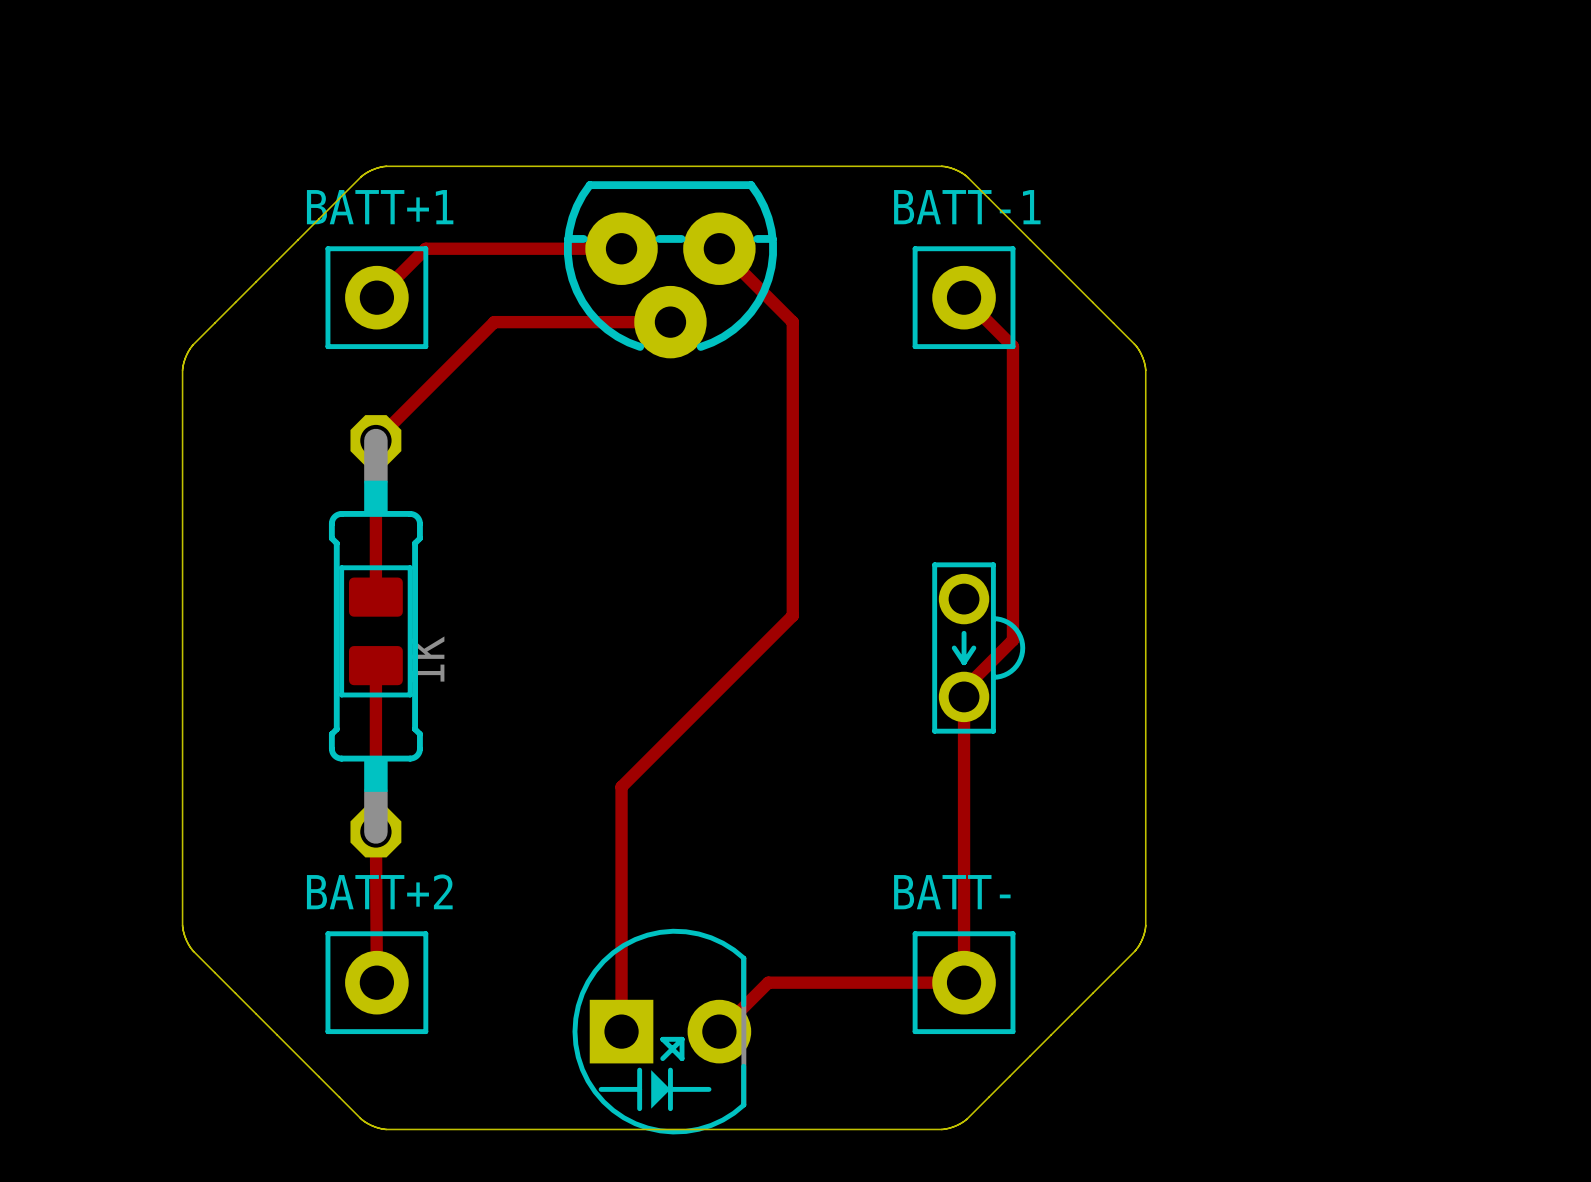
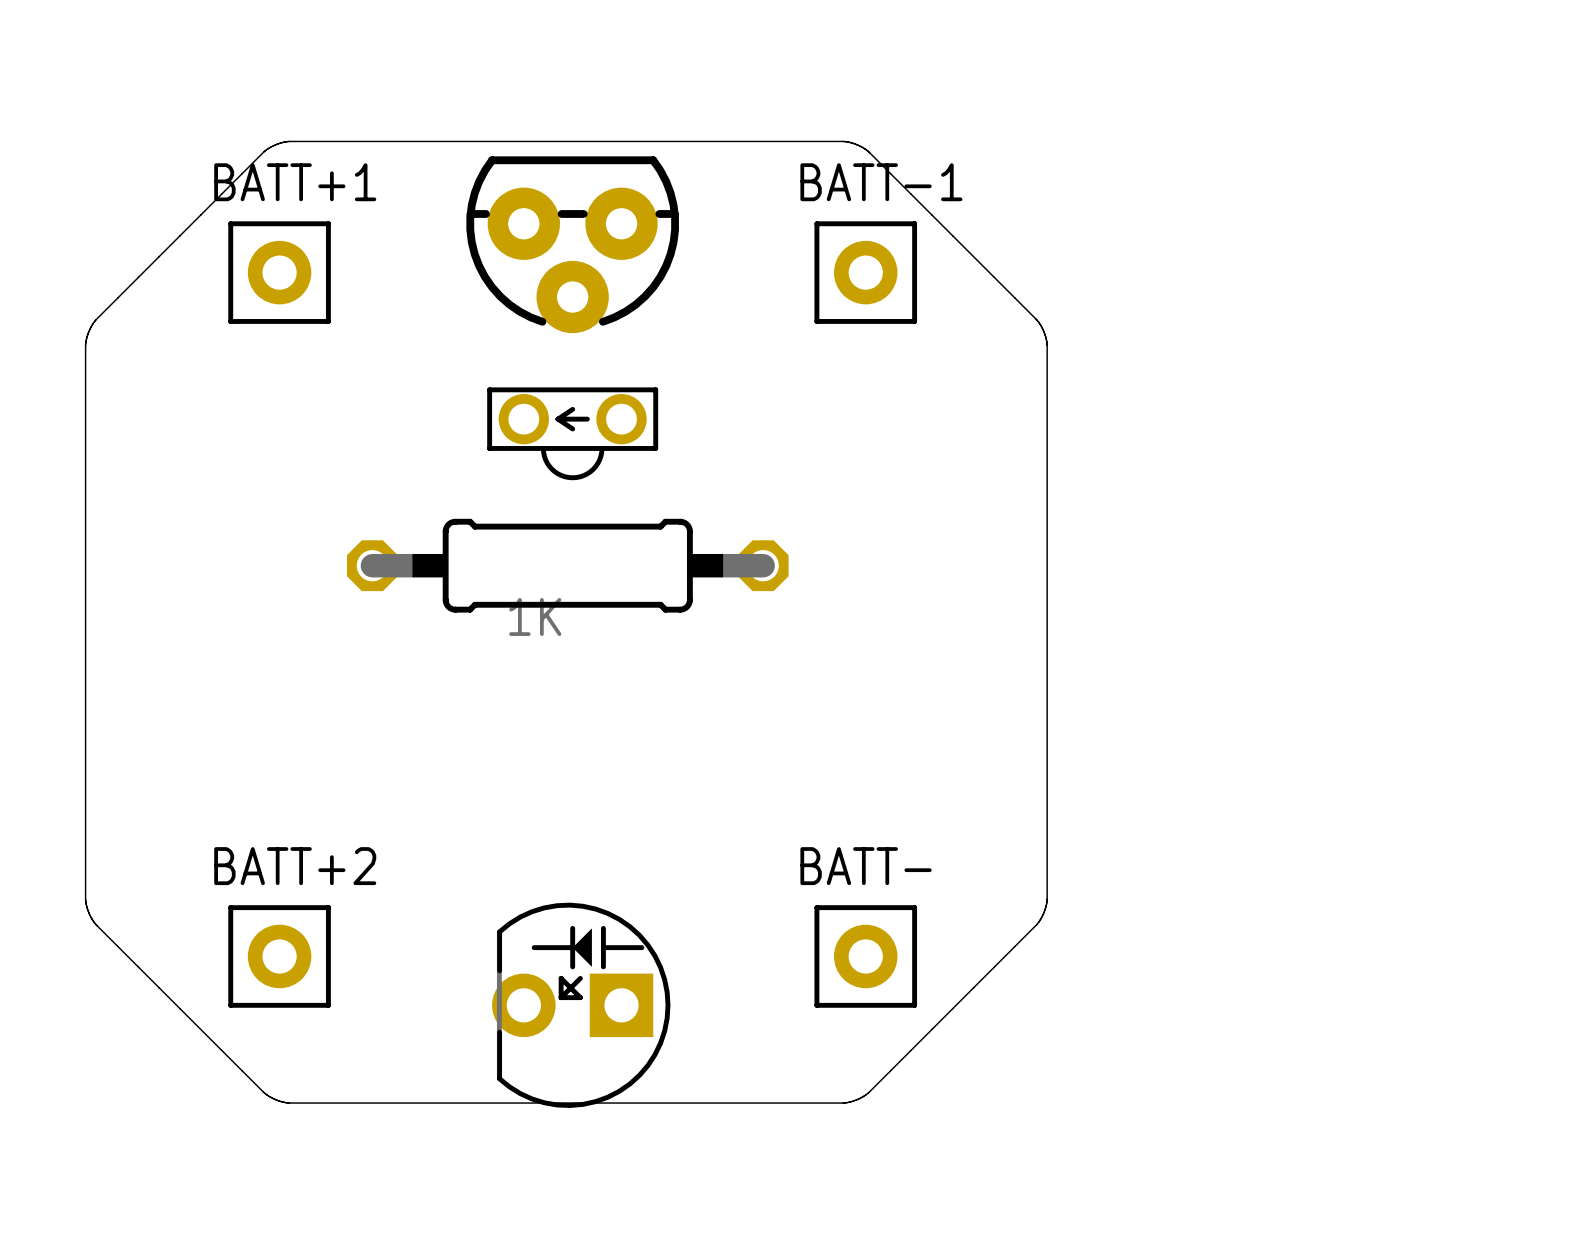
track: (621, 248) (425, 248) (376, 297) -> none
track: (719, 248) (792, 322) (792, 615) (621, 786) (621, 1031) -> none
track: (964, 297) (1012, 346) (1012, 640) (964, 689) (964, 982) (768, 982) (719, 1031) -> none
track: (670, 322) (494, 322) (375, 440) (375, 597) -> none
part: (375, 631) -> none
part rotation: 0° (375, 636) -> 90° clockwise (567, 565)
part position: (375, 636) -> (567, 565)
part rotation: 0° (978, 648) -> 90° clockwise (572, 433)
part position: (978, 648) -> (572, 433)
track: (375, 665) (376, 982) -> none
part rotation: 0° (661, 1031) -> 180° (581, 1005)

